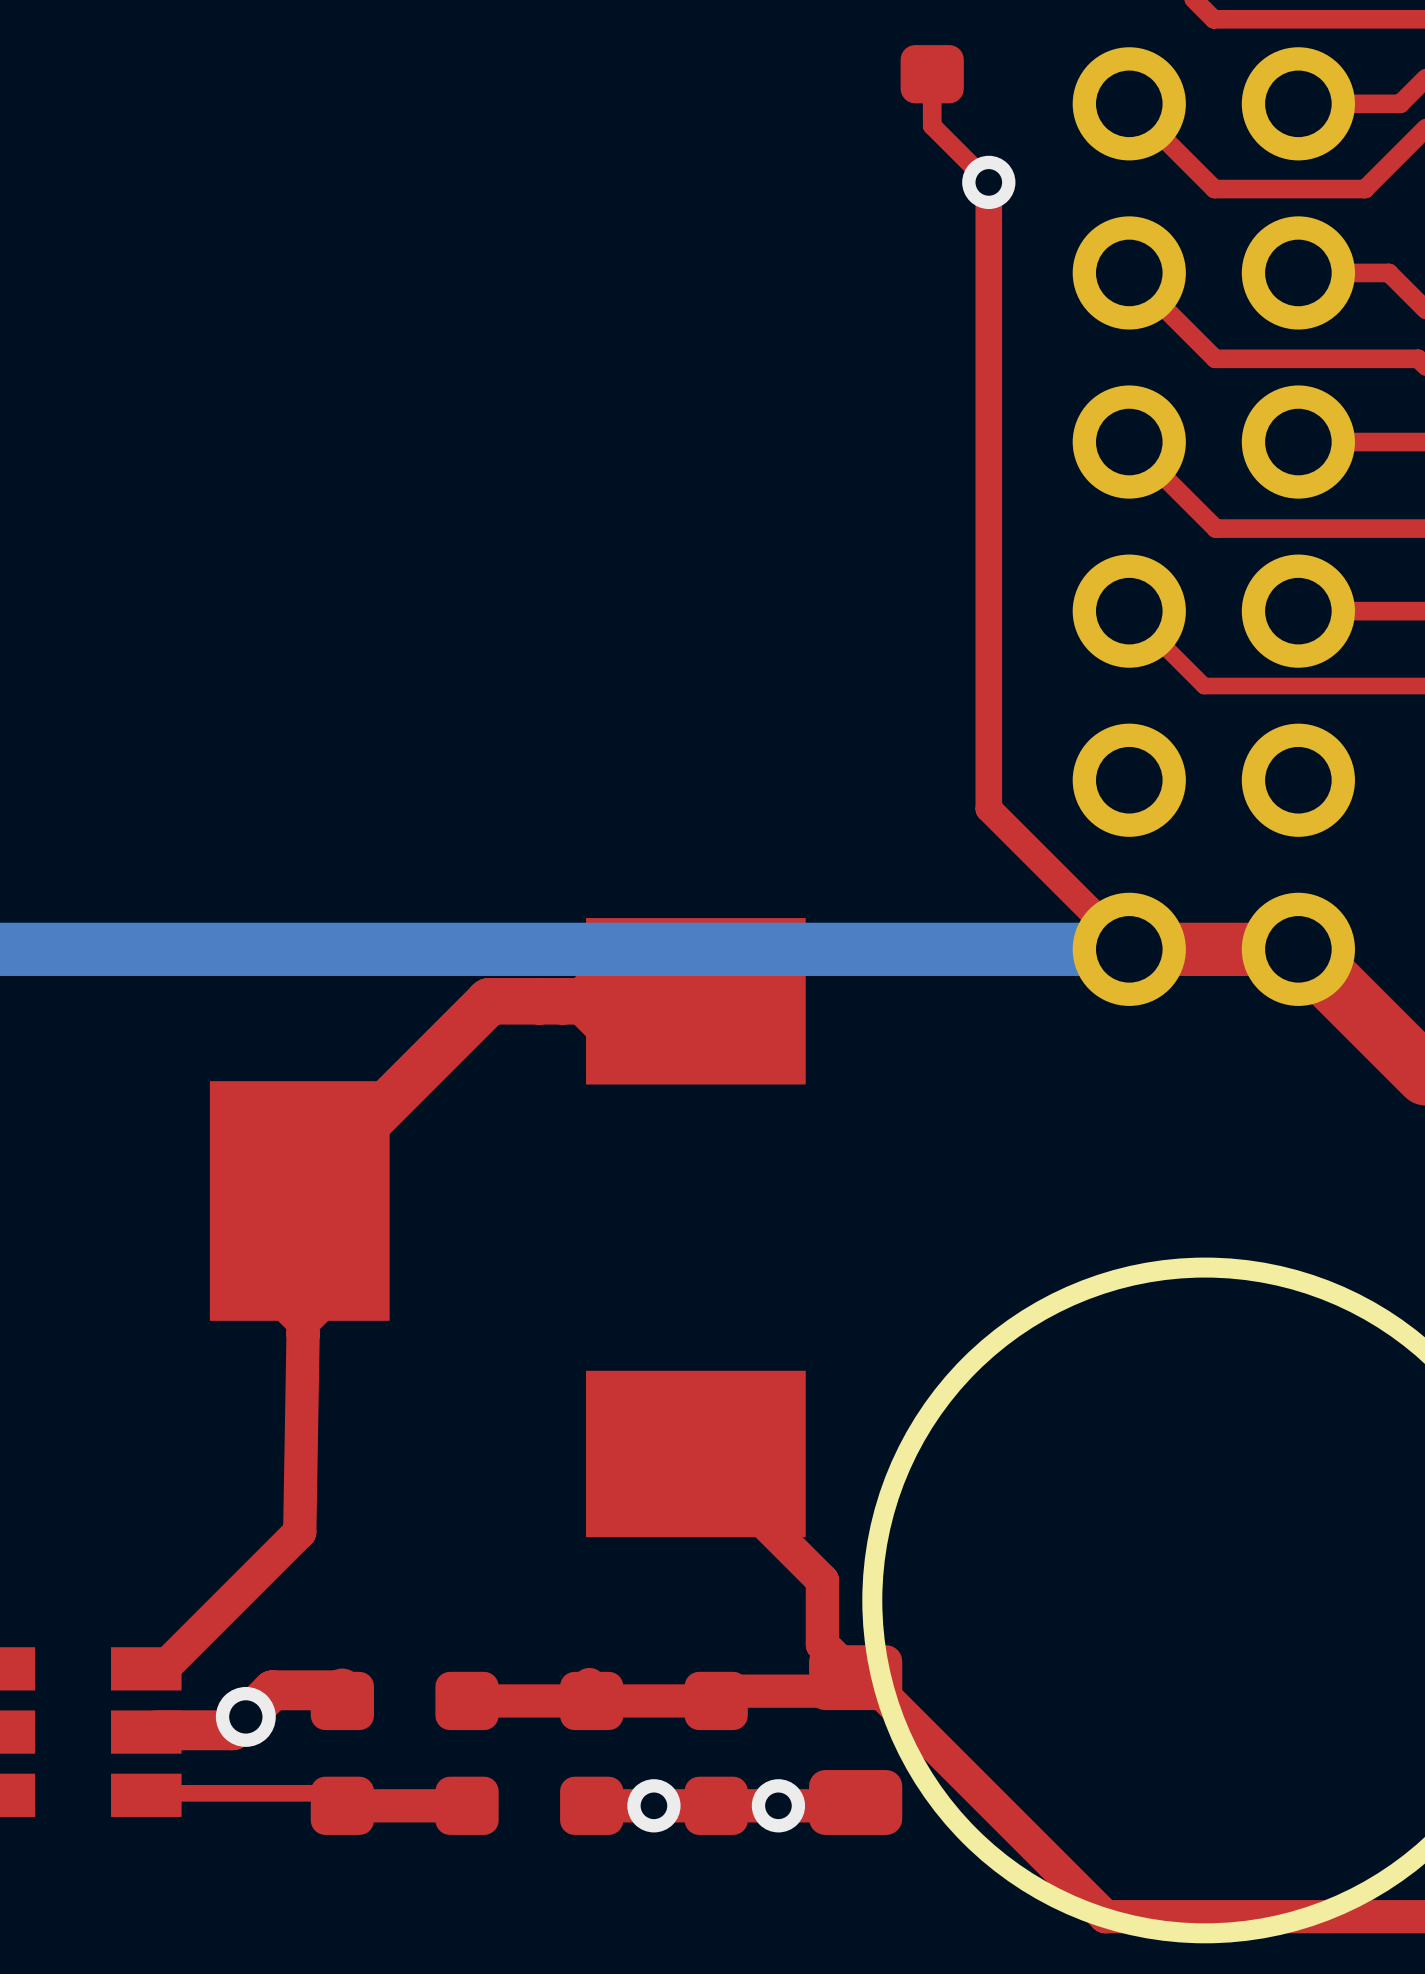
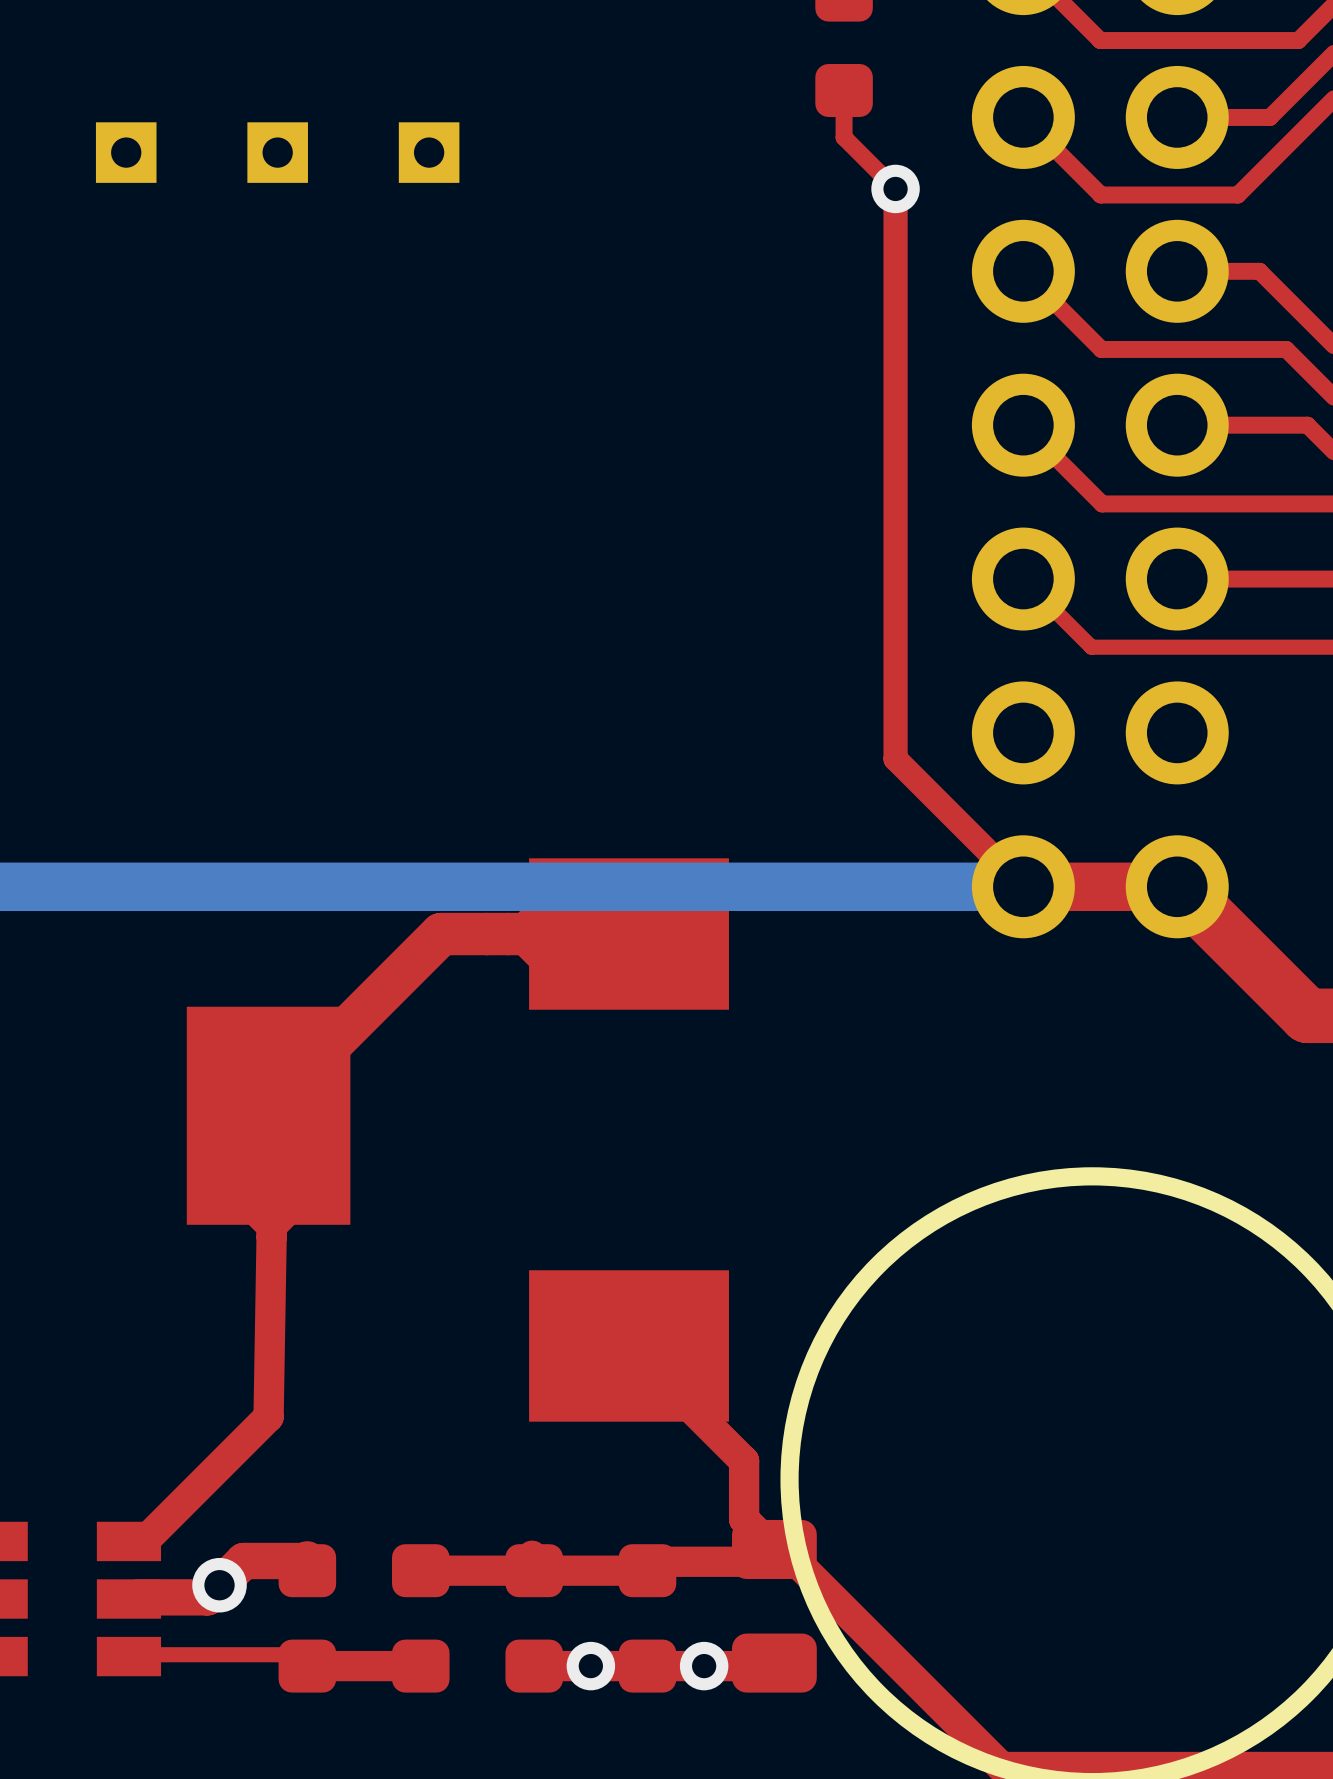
part: none -> (126, 152)
part: none -> (277, 152)
part: none -> (429, 152)

